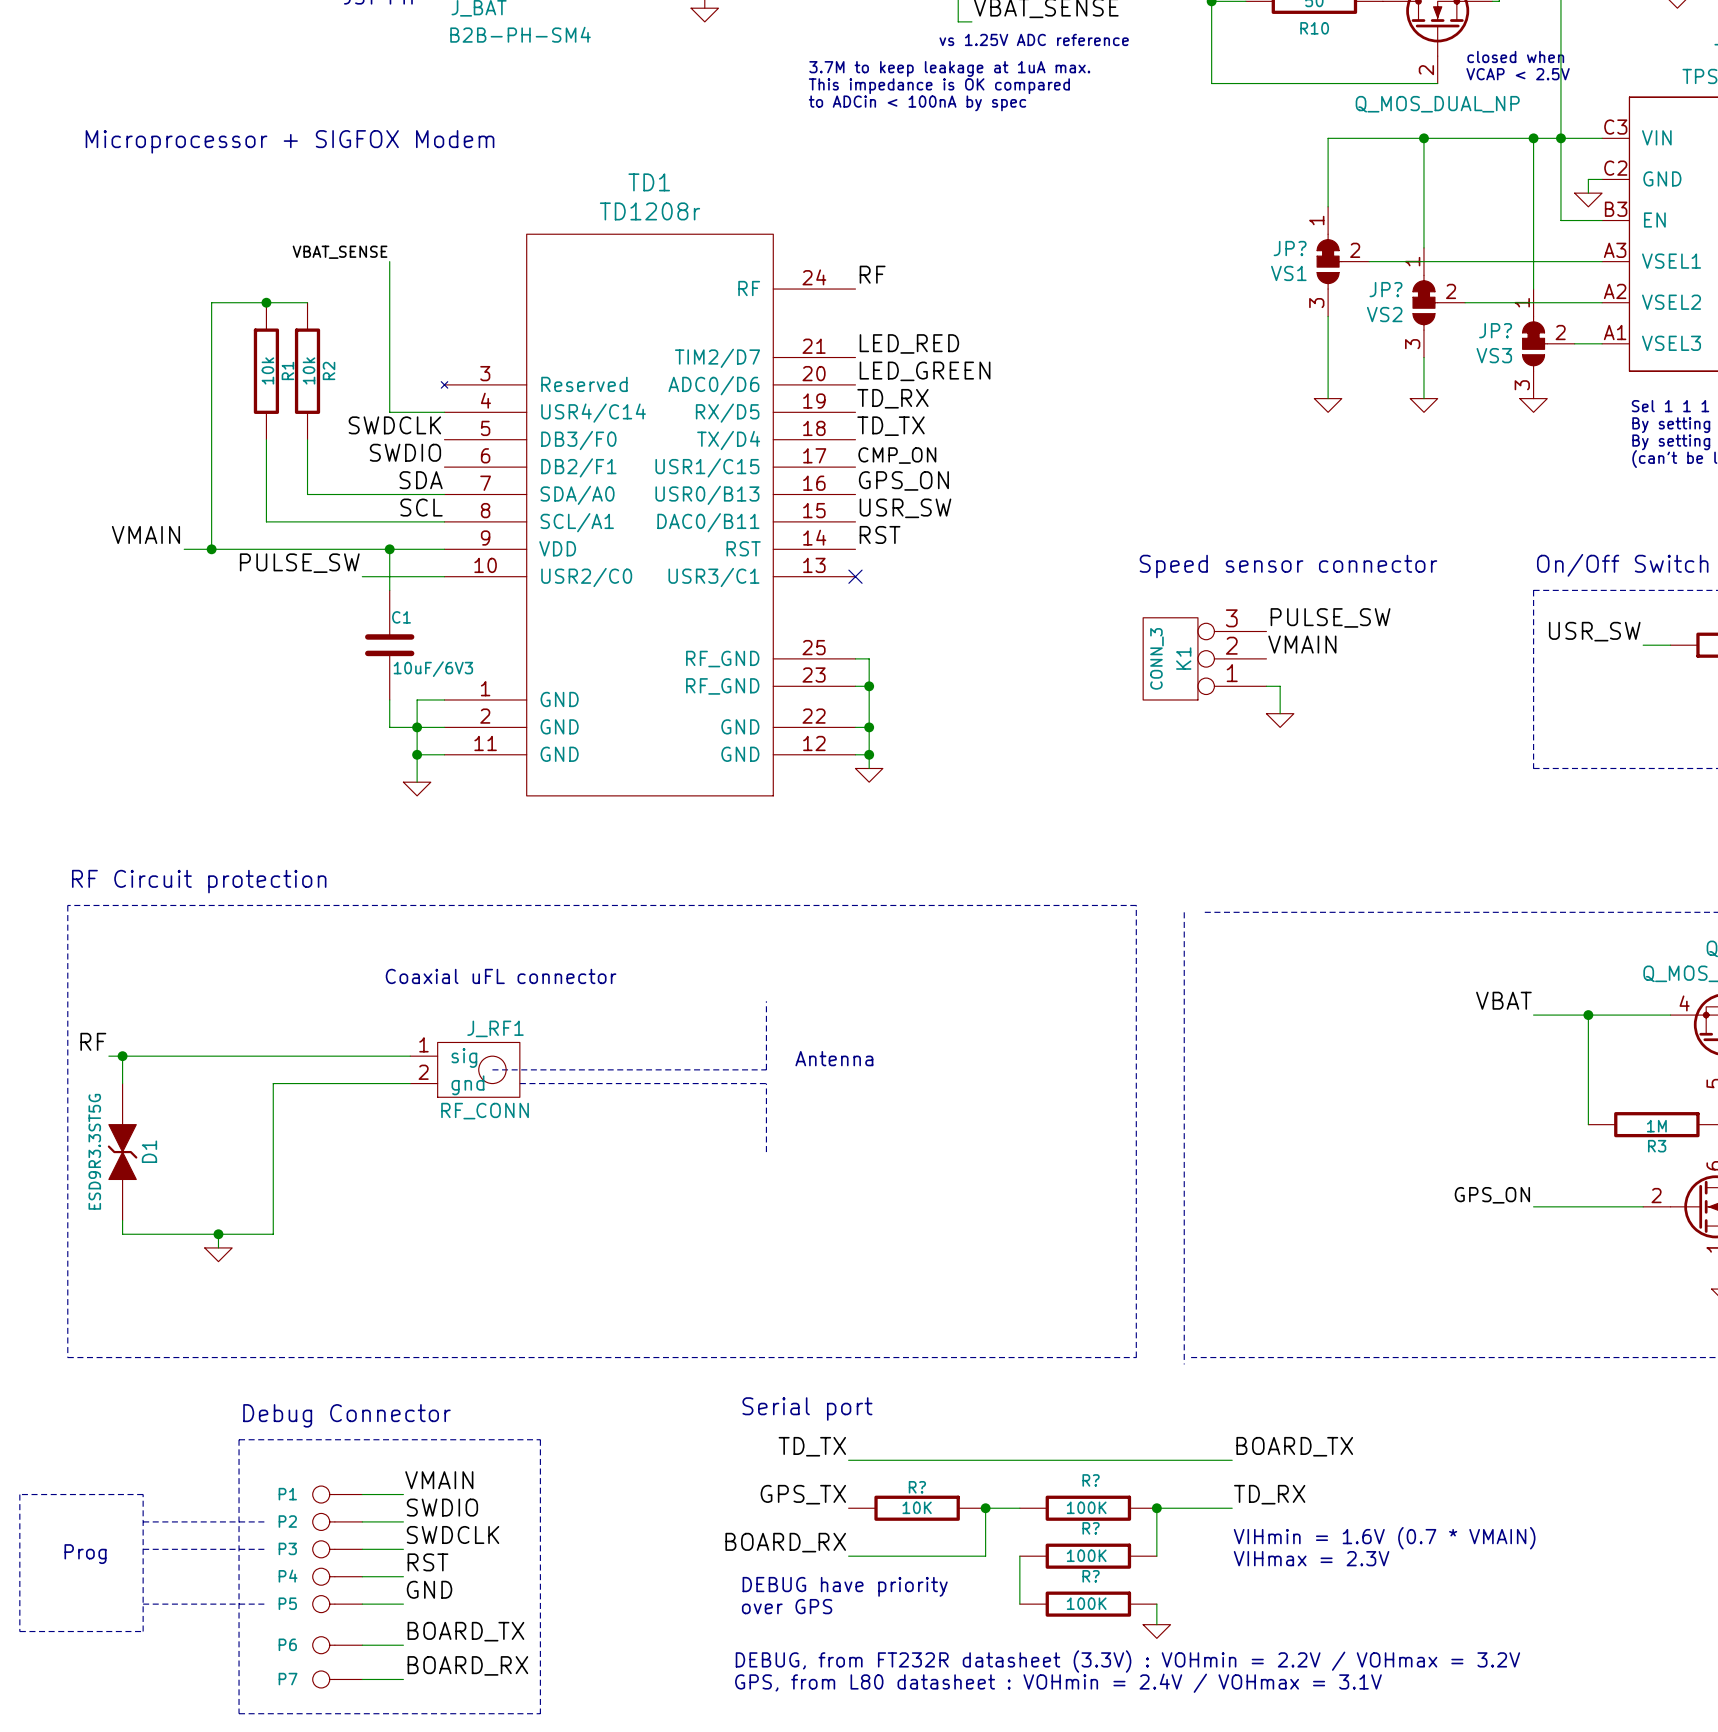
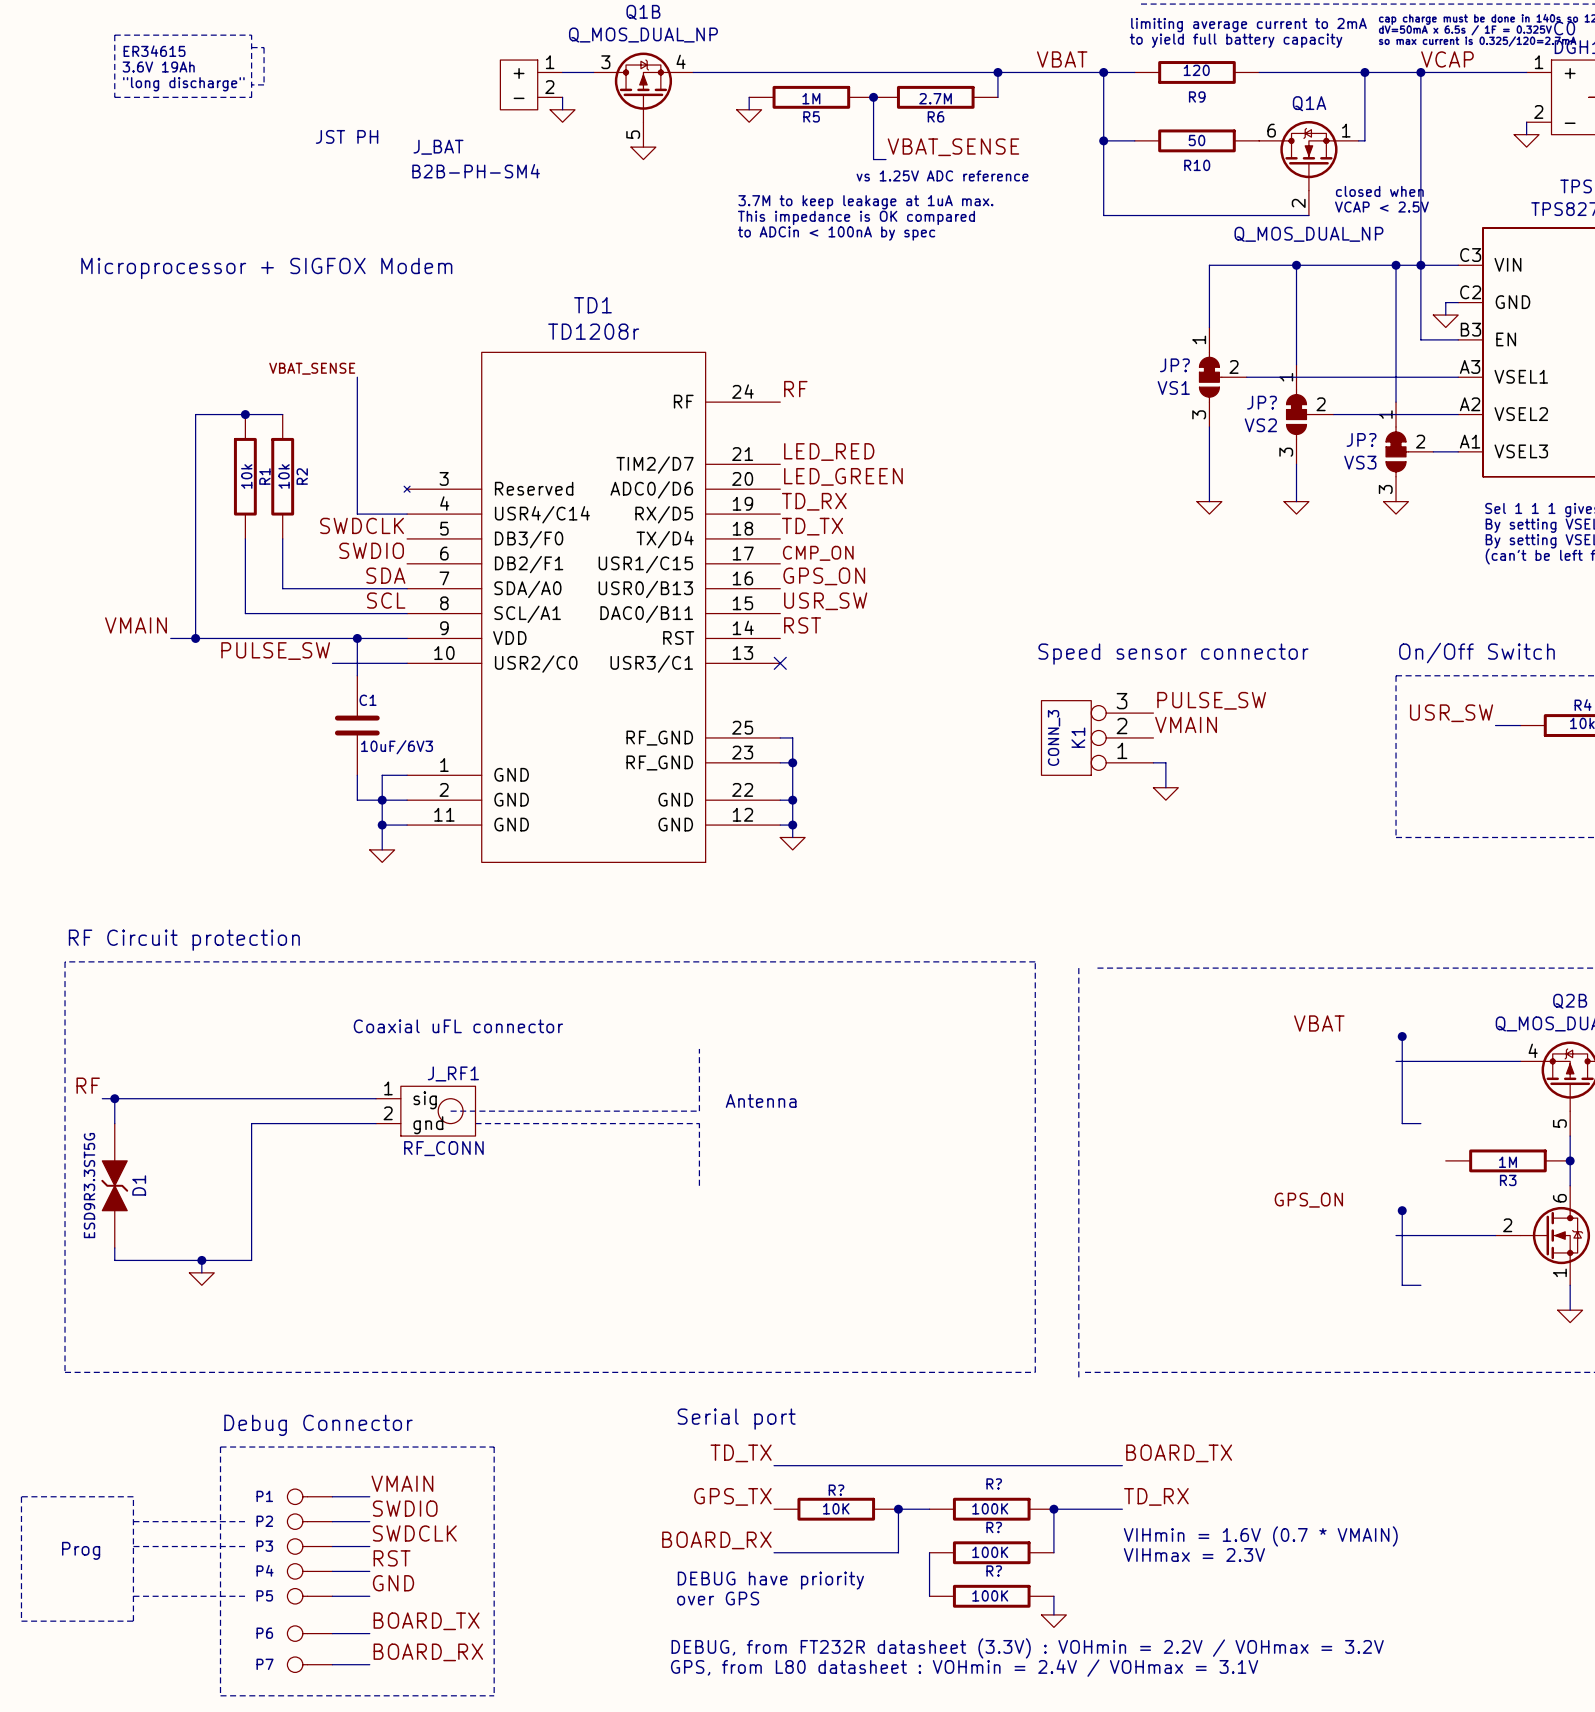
wire: none -> (1402, 1036) (1402, 1123) (1420, 1123)
label position: VBAT (1503, 1000) -> VBAT (1319, 1023)
wire: (1588, 1015) (1588, 1124) -> none
junction position: (1588, 1015) -> (1402, 1036)
wire: none -> (1402, 1210) (1402, 1285) (1420, 1285)
junction: none -> (1402, 1210)
label position: GPS_ON (1492, 1195) -> GPS_ON (1308, 1200)

